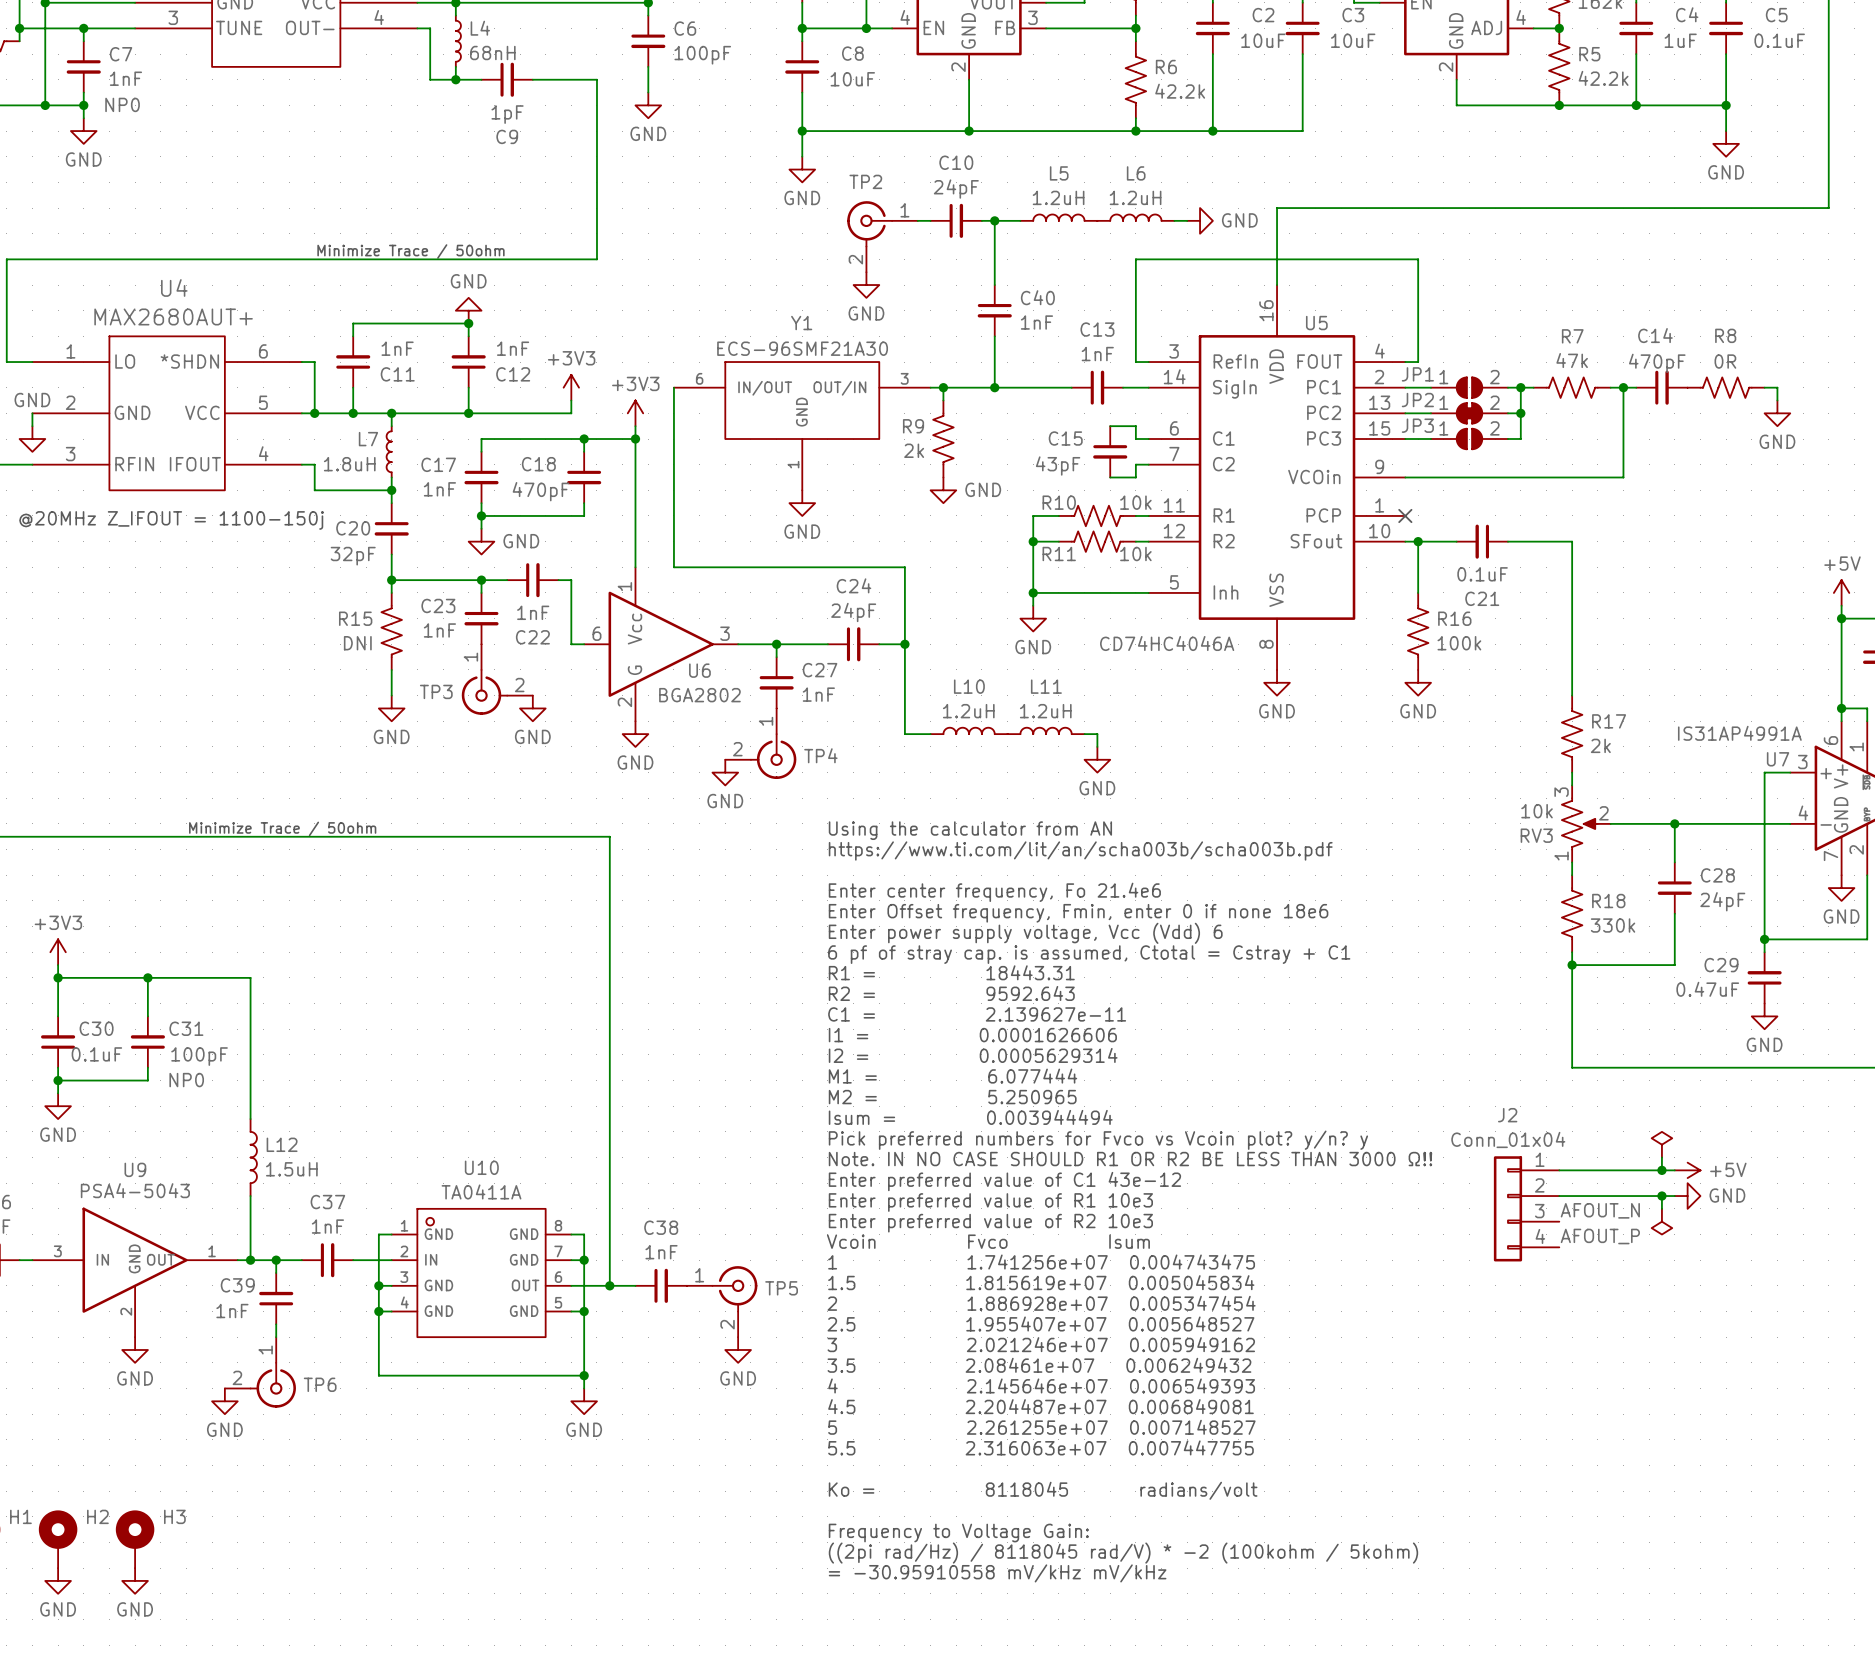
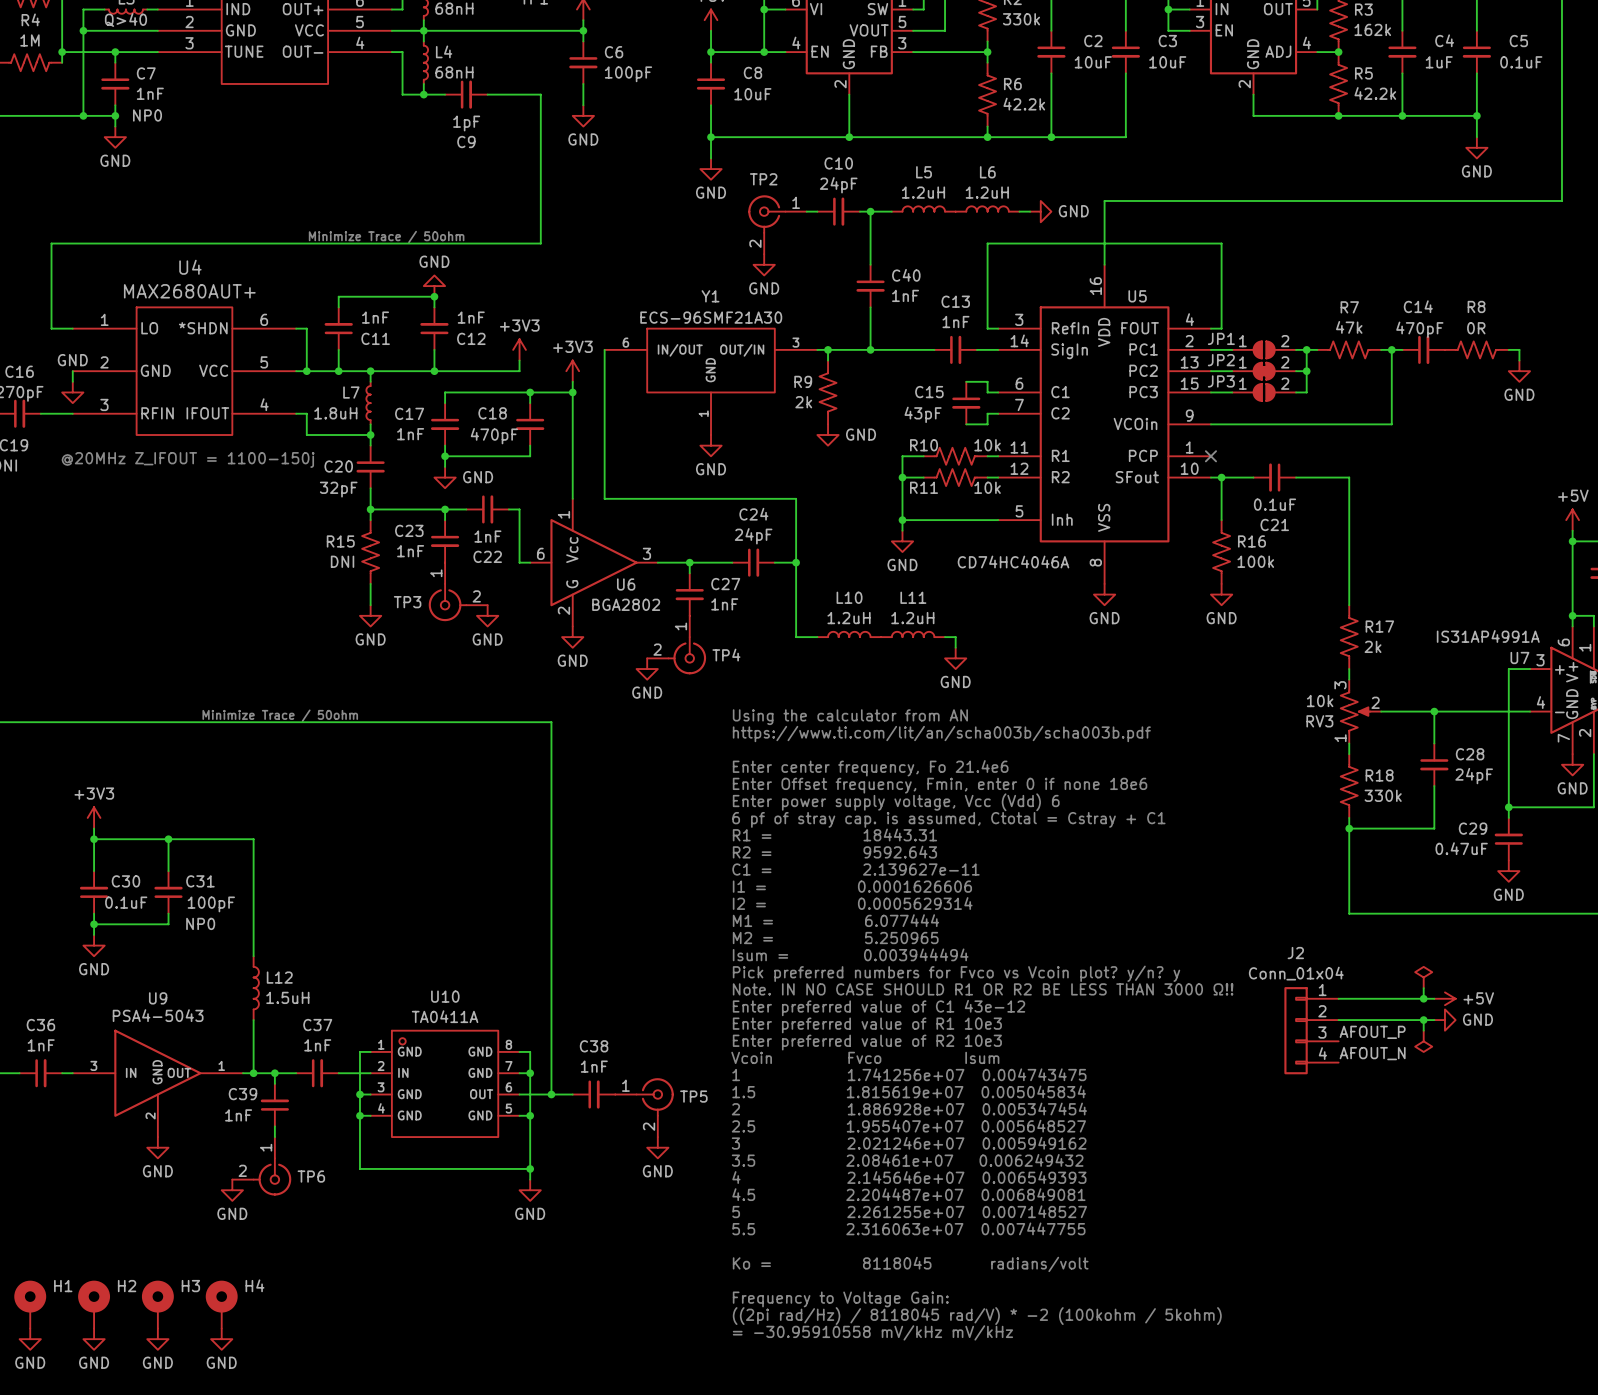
label: AFOUT_N (1600, 1210) -> AFOUT_P (1372, 1032)
label: AFOUT_P (1600, 1236) -> AFOUT_N (1372, 1053)
H4: none -> (221, 1304)
power symbol: none -> GND (221, 1339)

